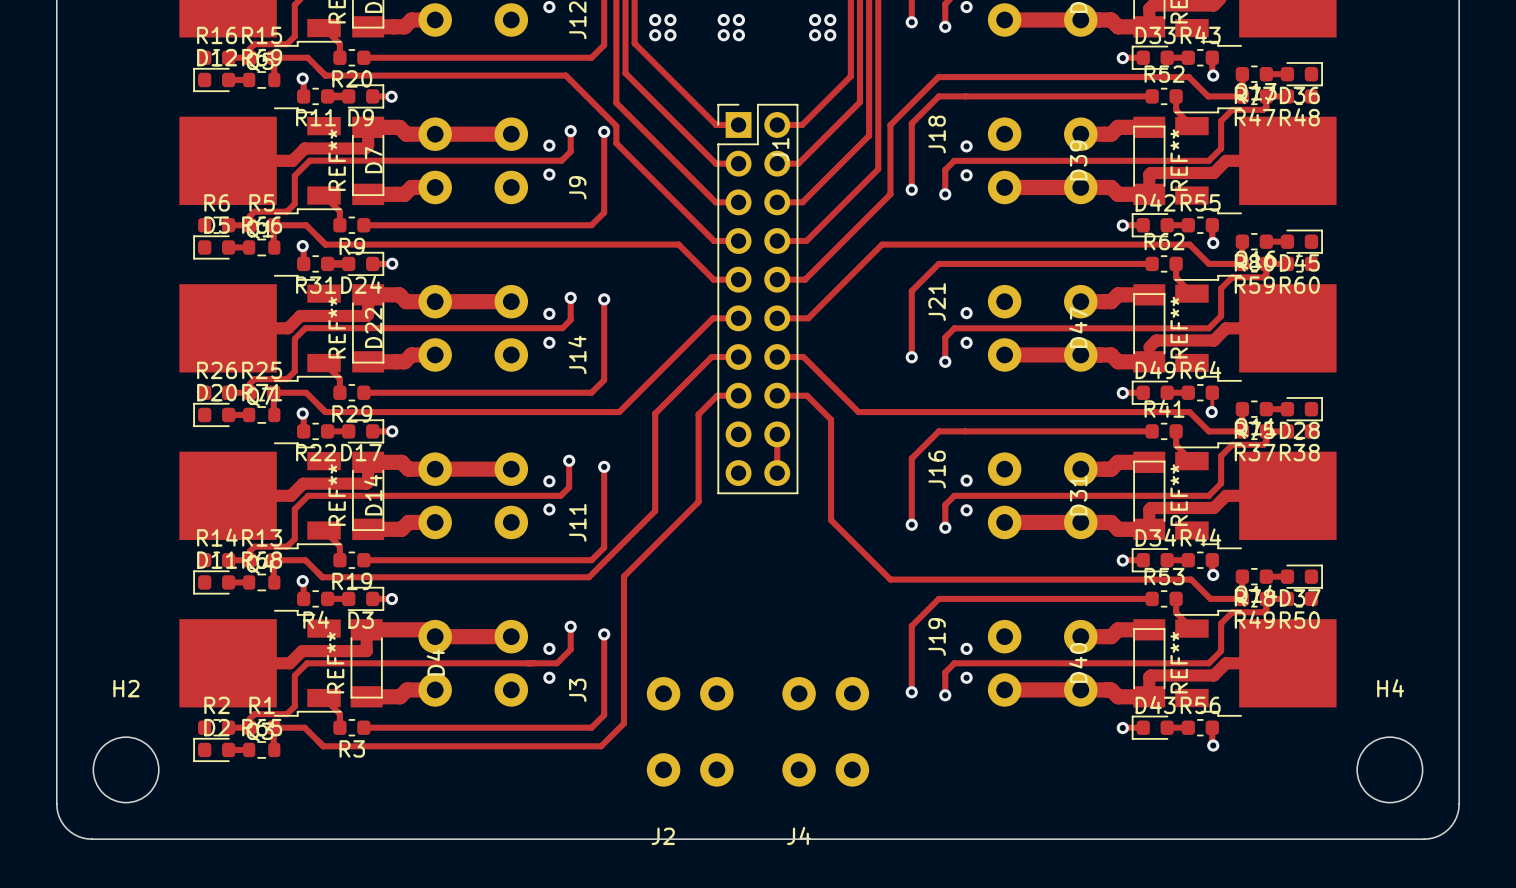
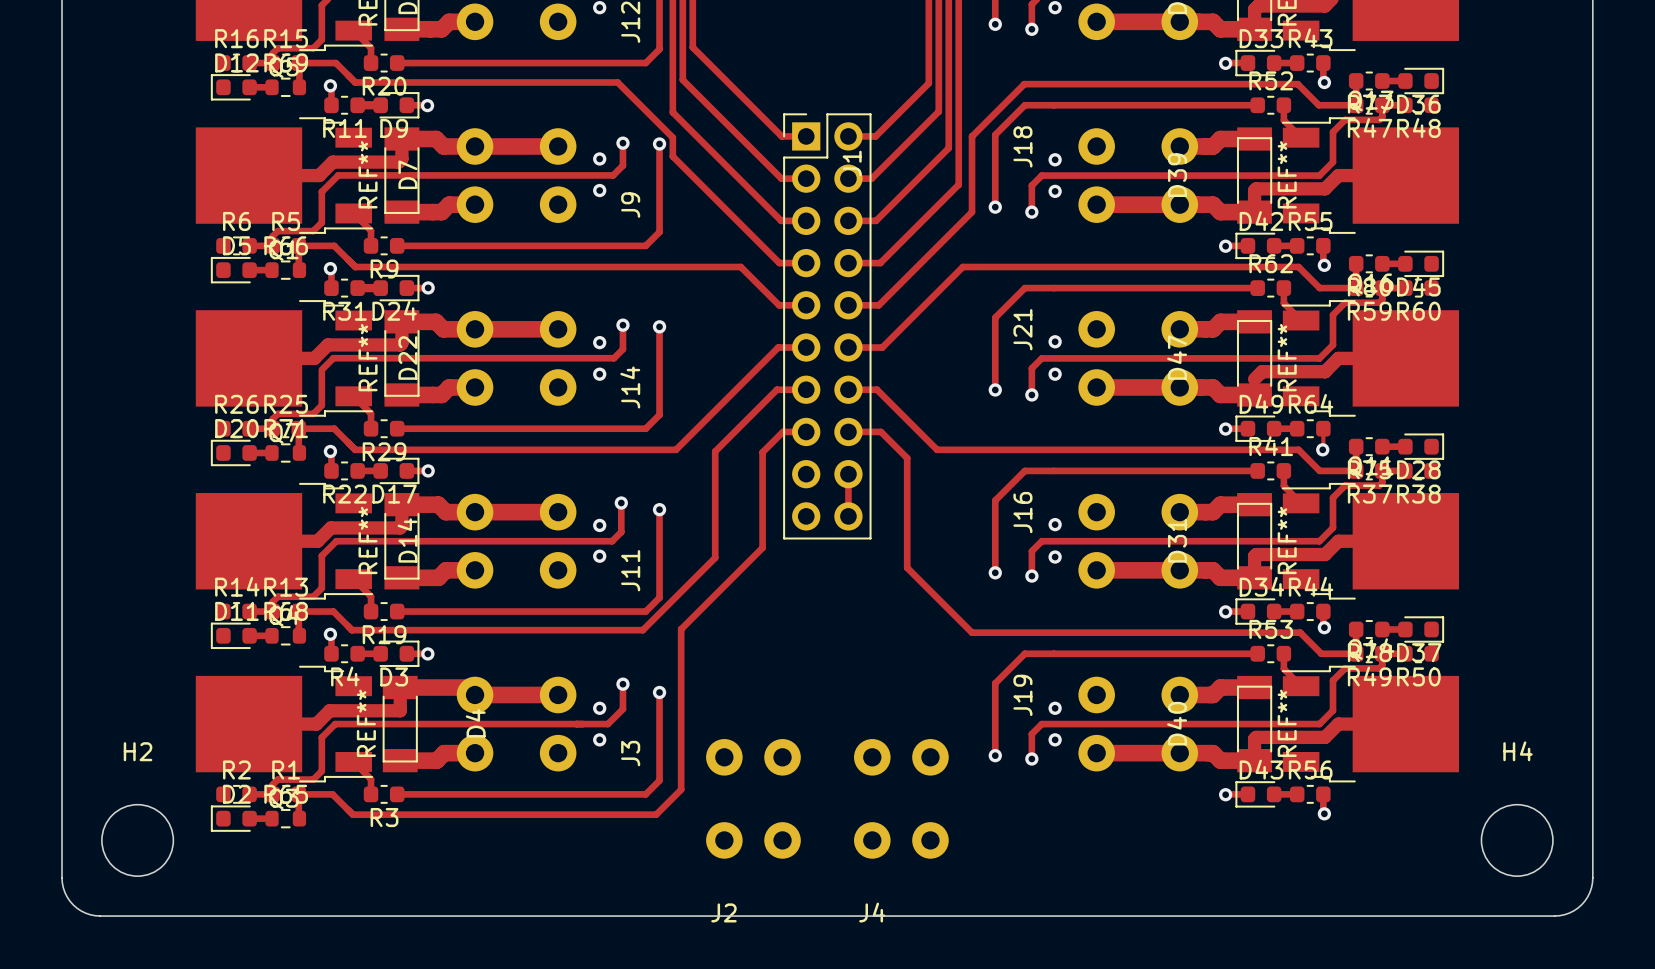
via: (655, 19) -> none
via: (670, 19) -> none
via: (723, 19) -> none
via: (738, 19) -> none
via: (815, 19) -> none
via: (830, 19) -> none
via: (655, 35) -> none
via: (670, 35) -> none
via: (723, 35) -> none
via: (738, 35) -> none
via: (815, 35) -> none
via: (830, 35) -> none

